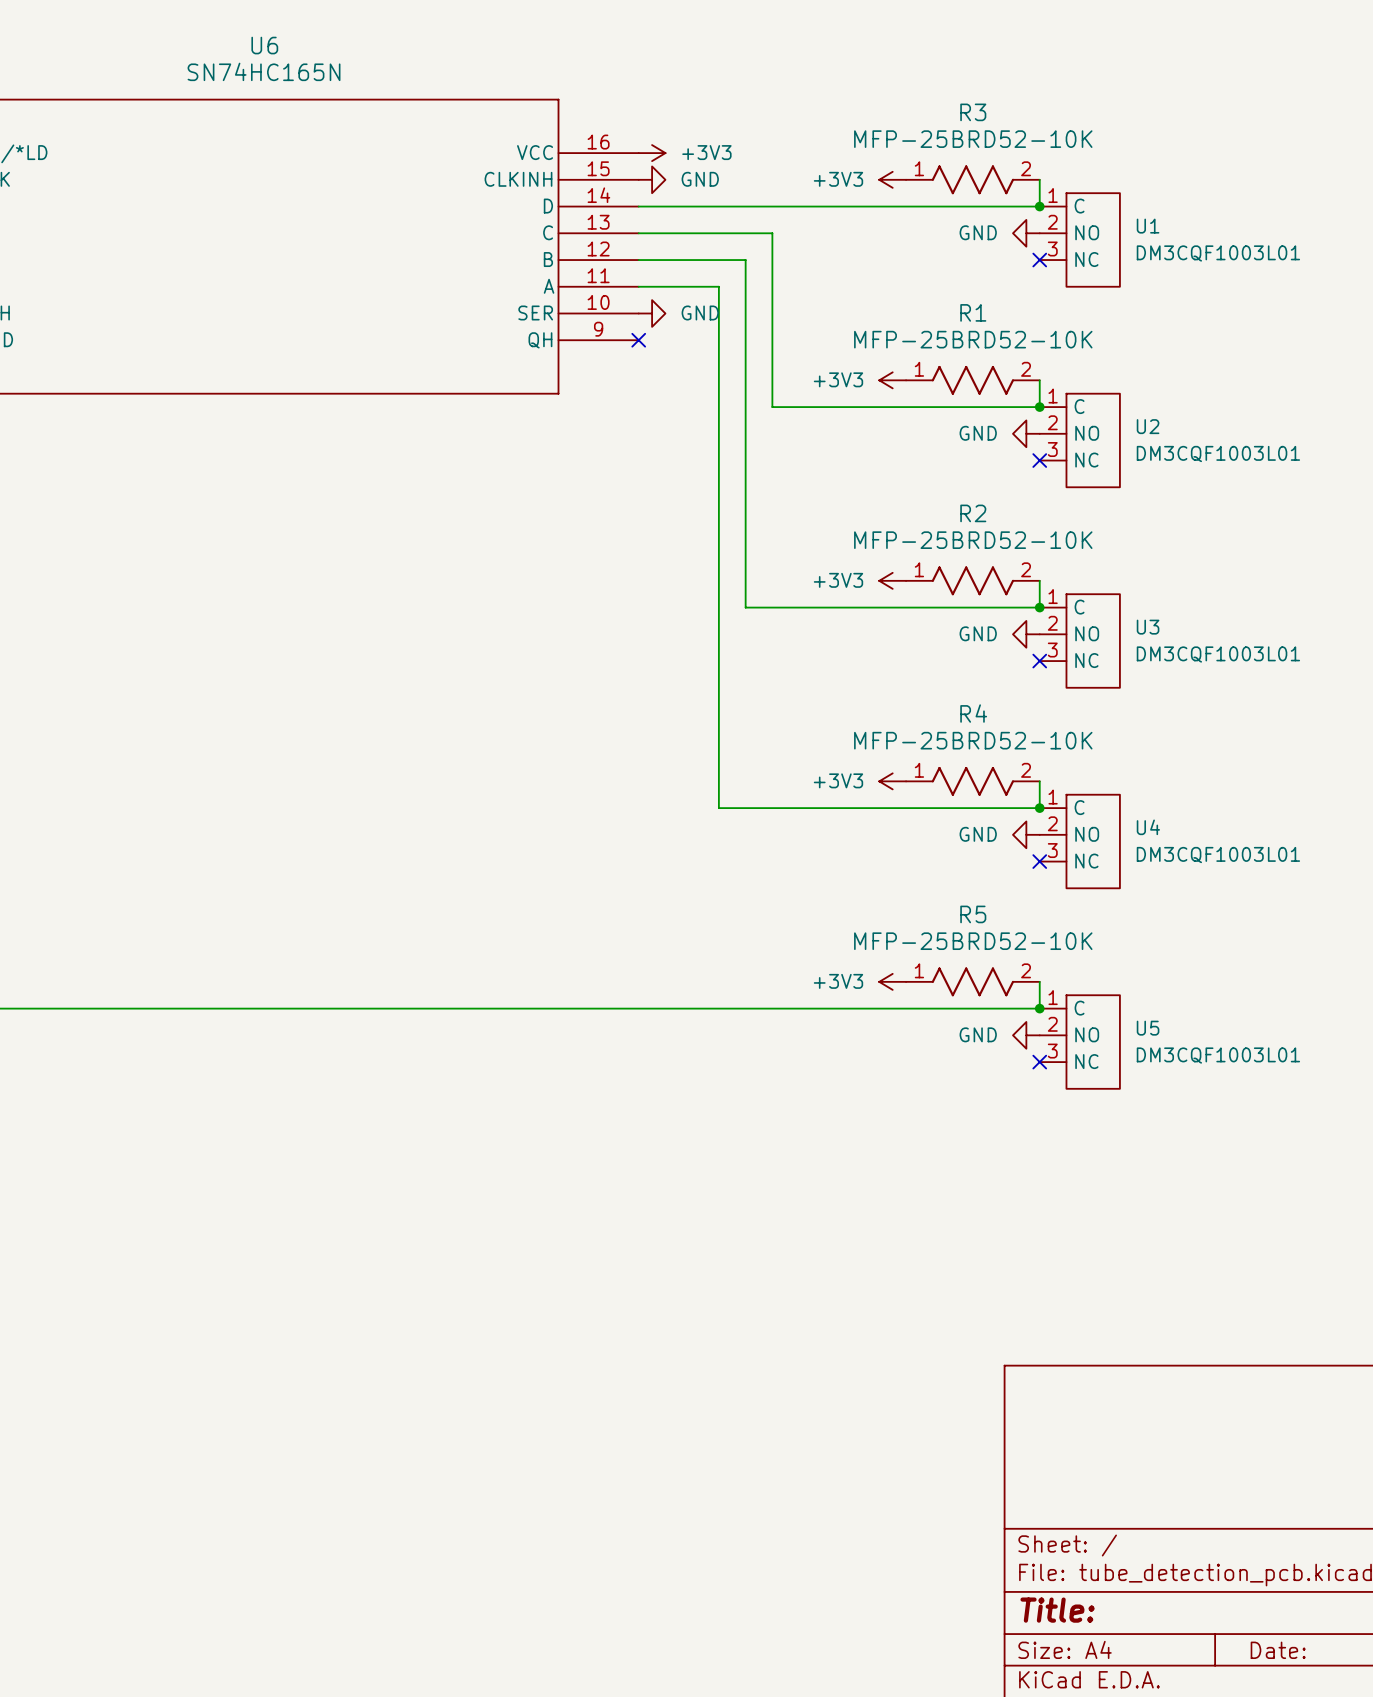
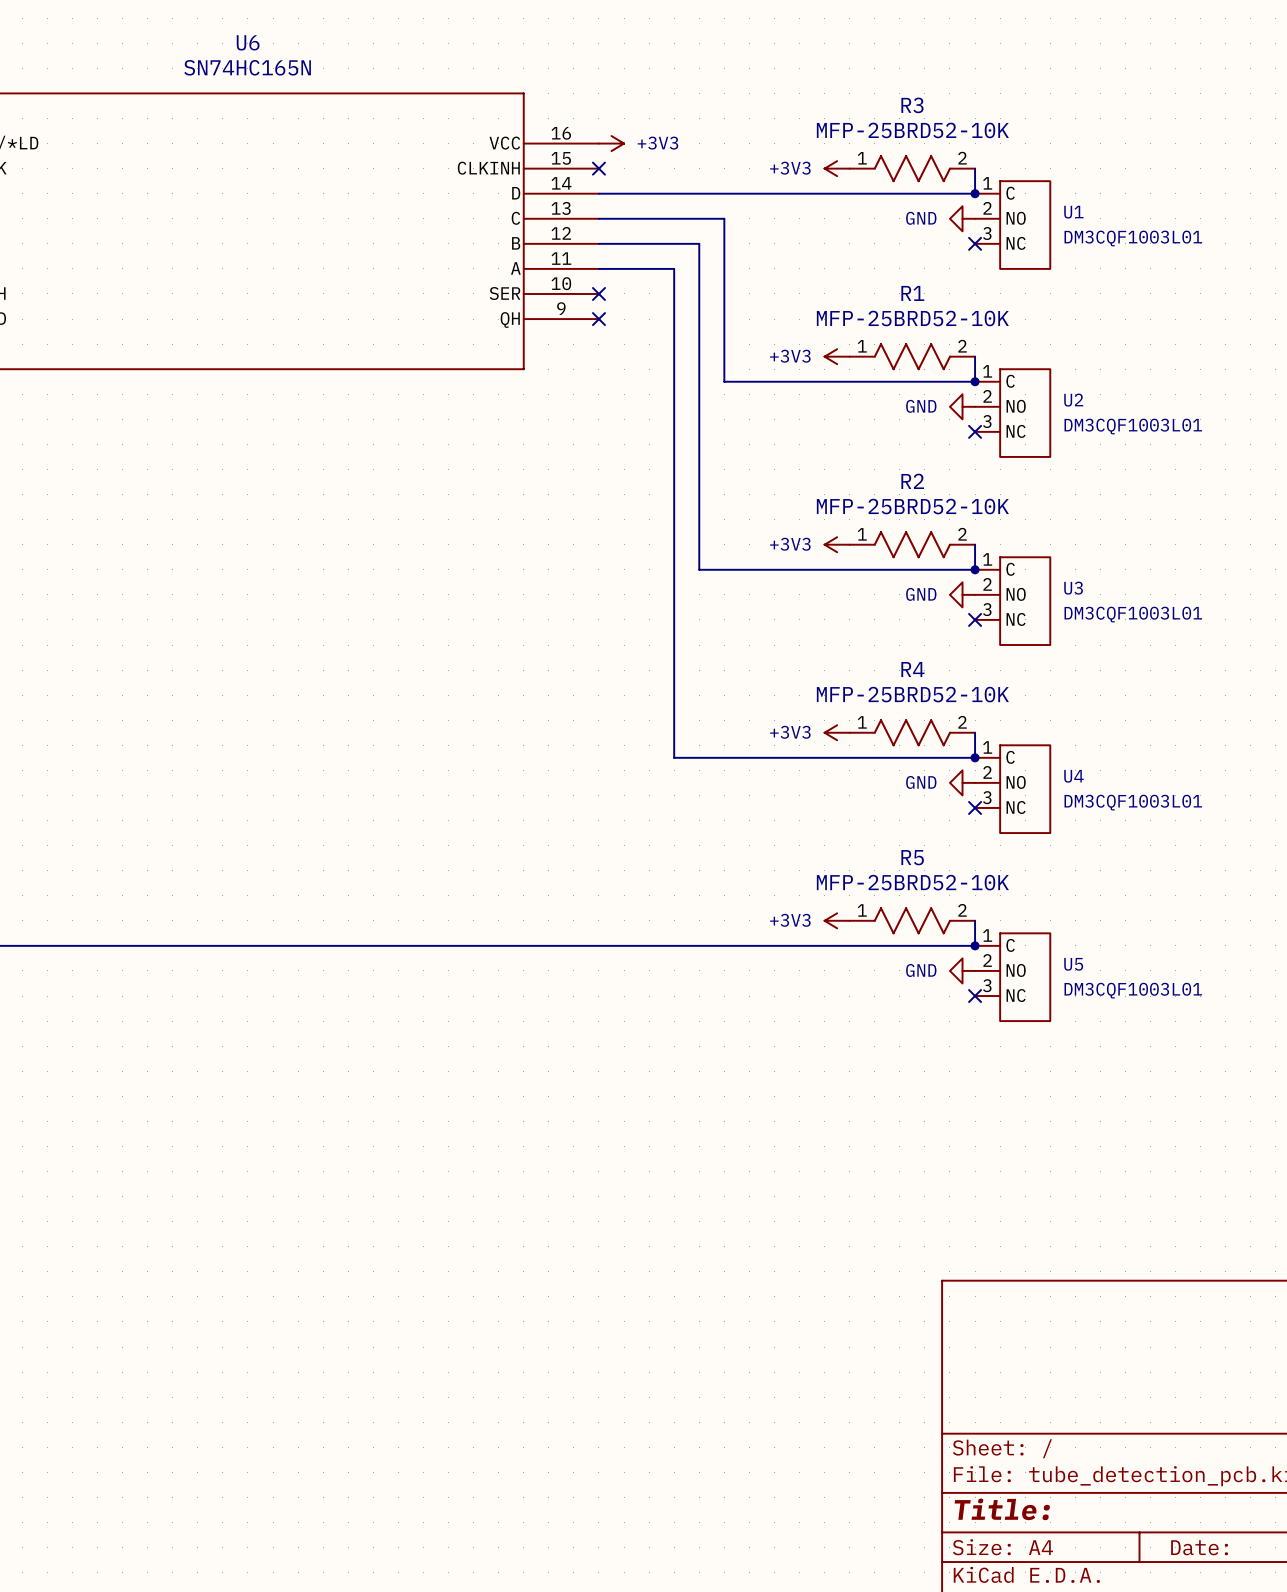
no-connect mark: none -> (598, 168)
power symbol: GND (652, 179) -> none
no-connect mark: none -> (598, 293)
power symbol: GND (652, 313) -> none

